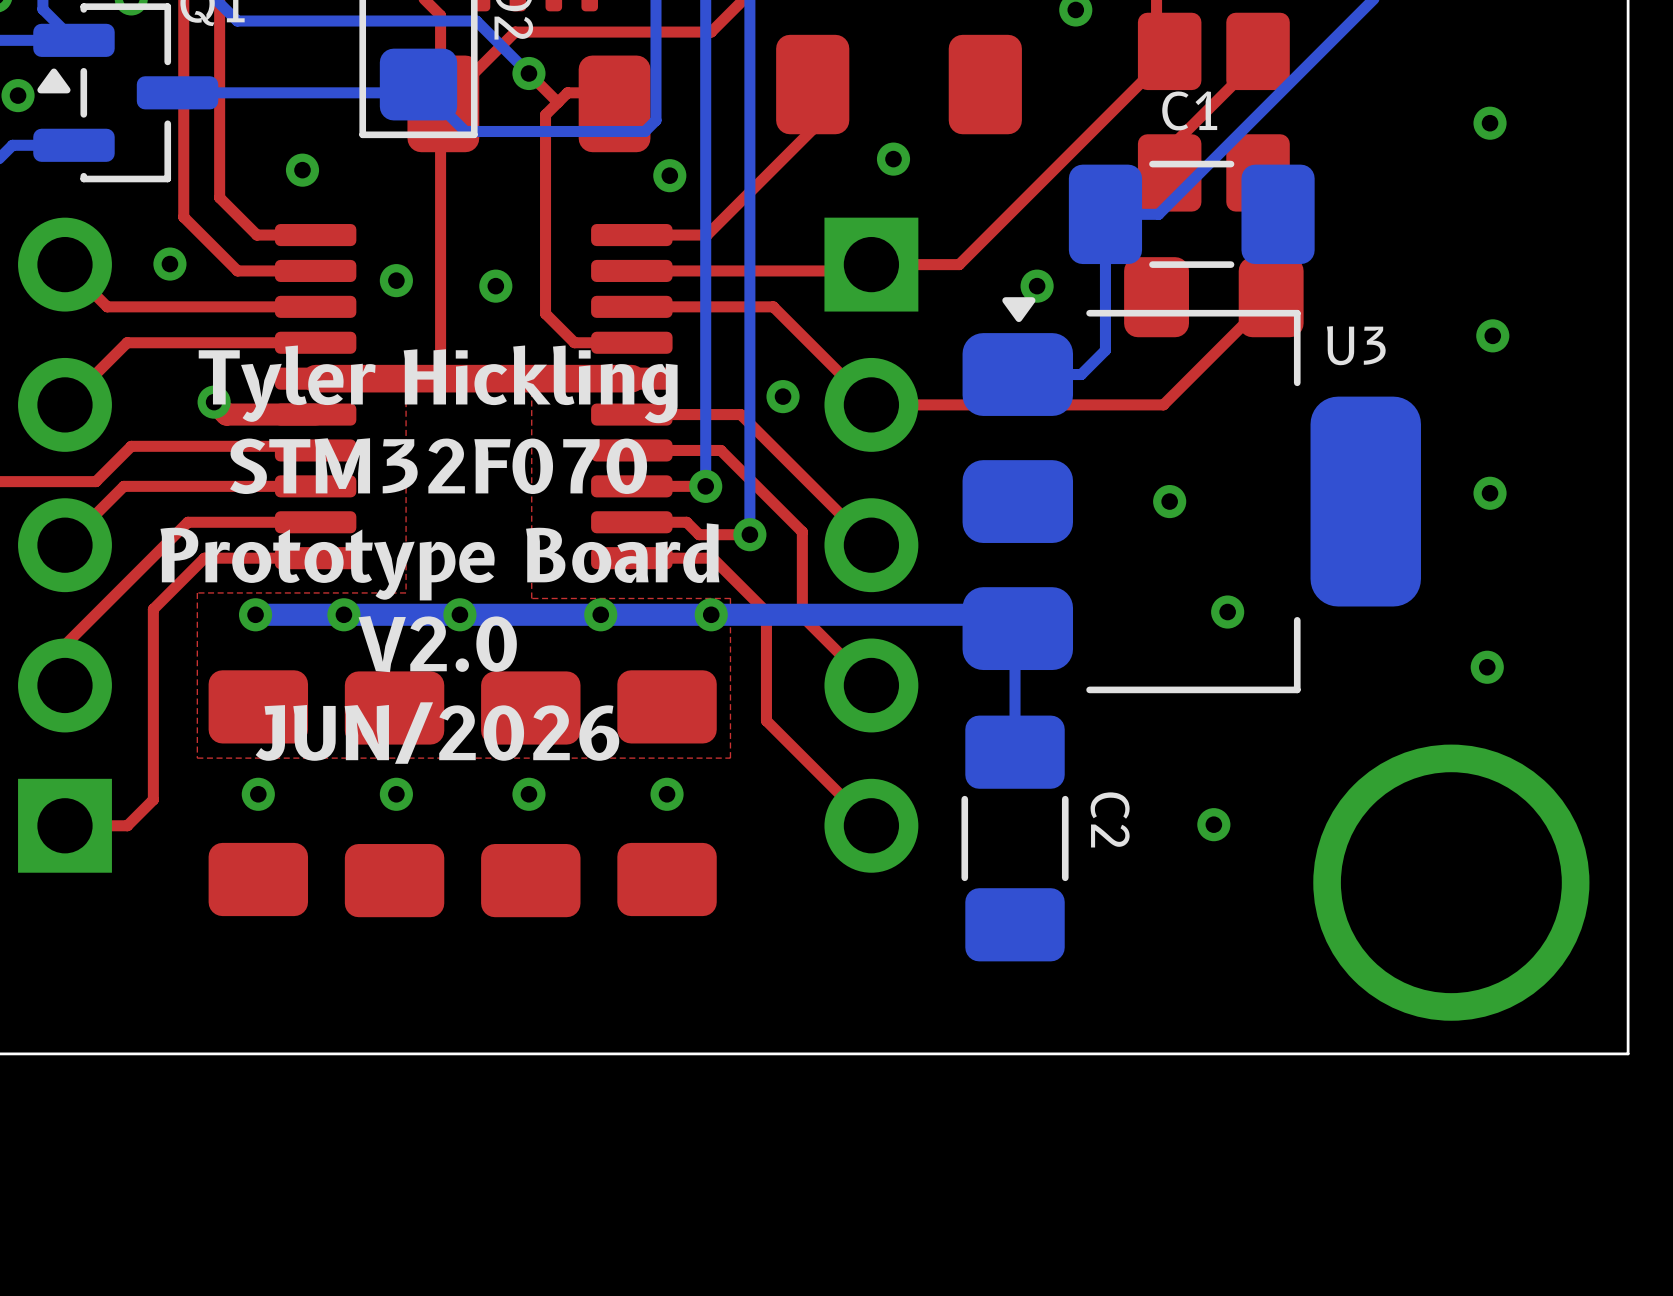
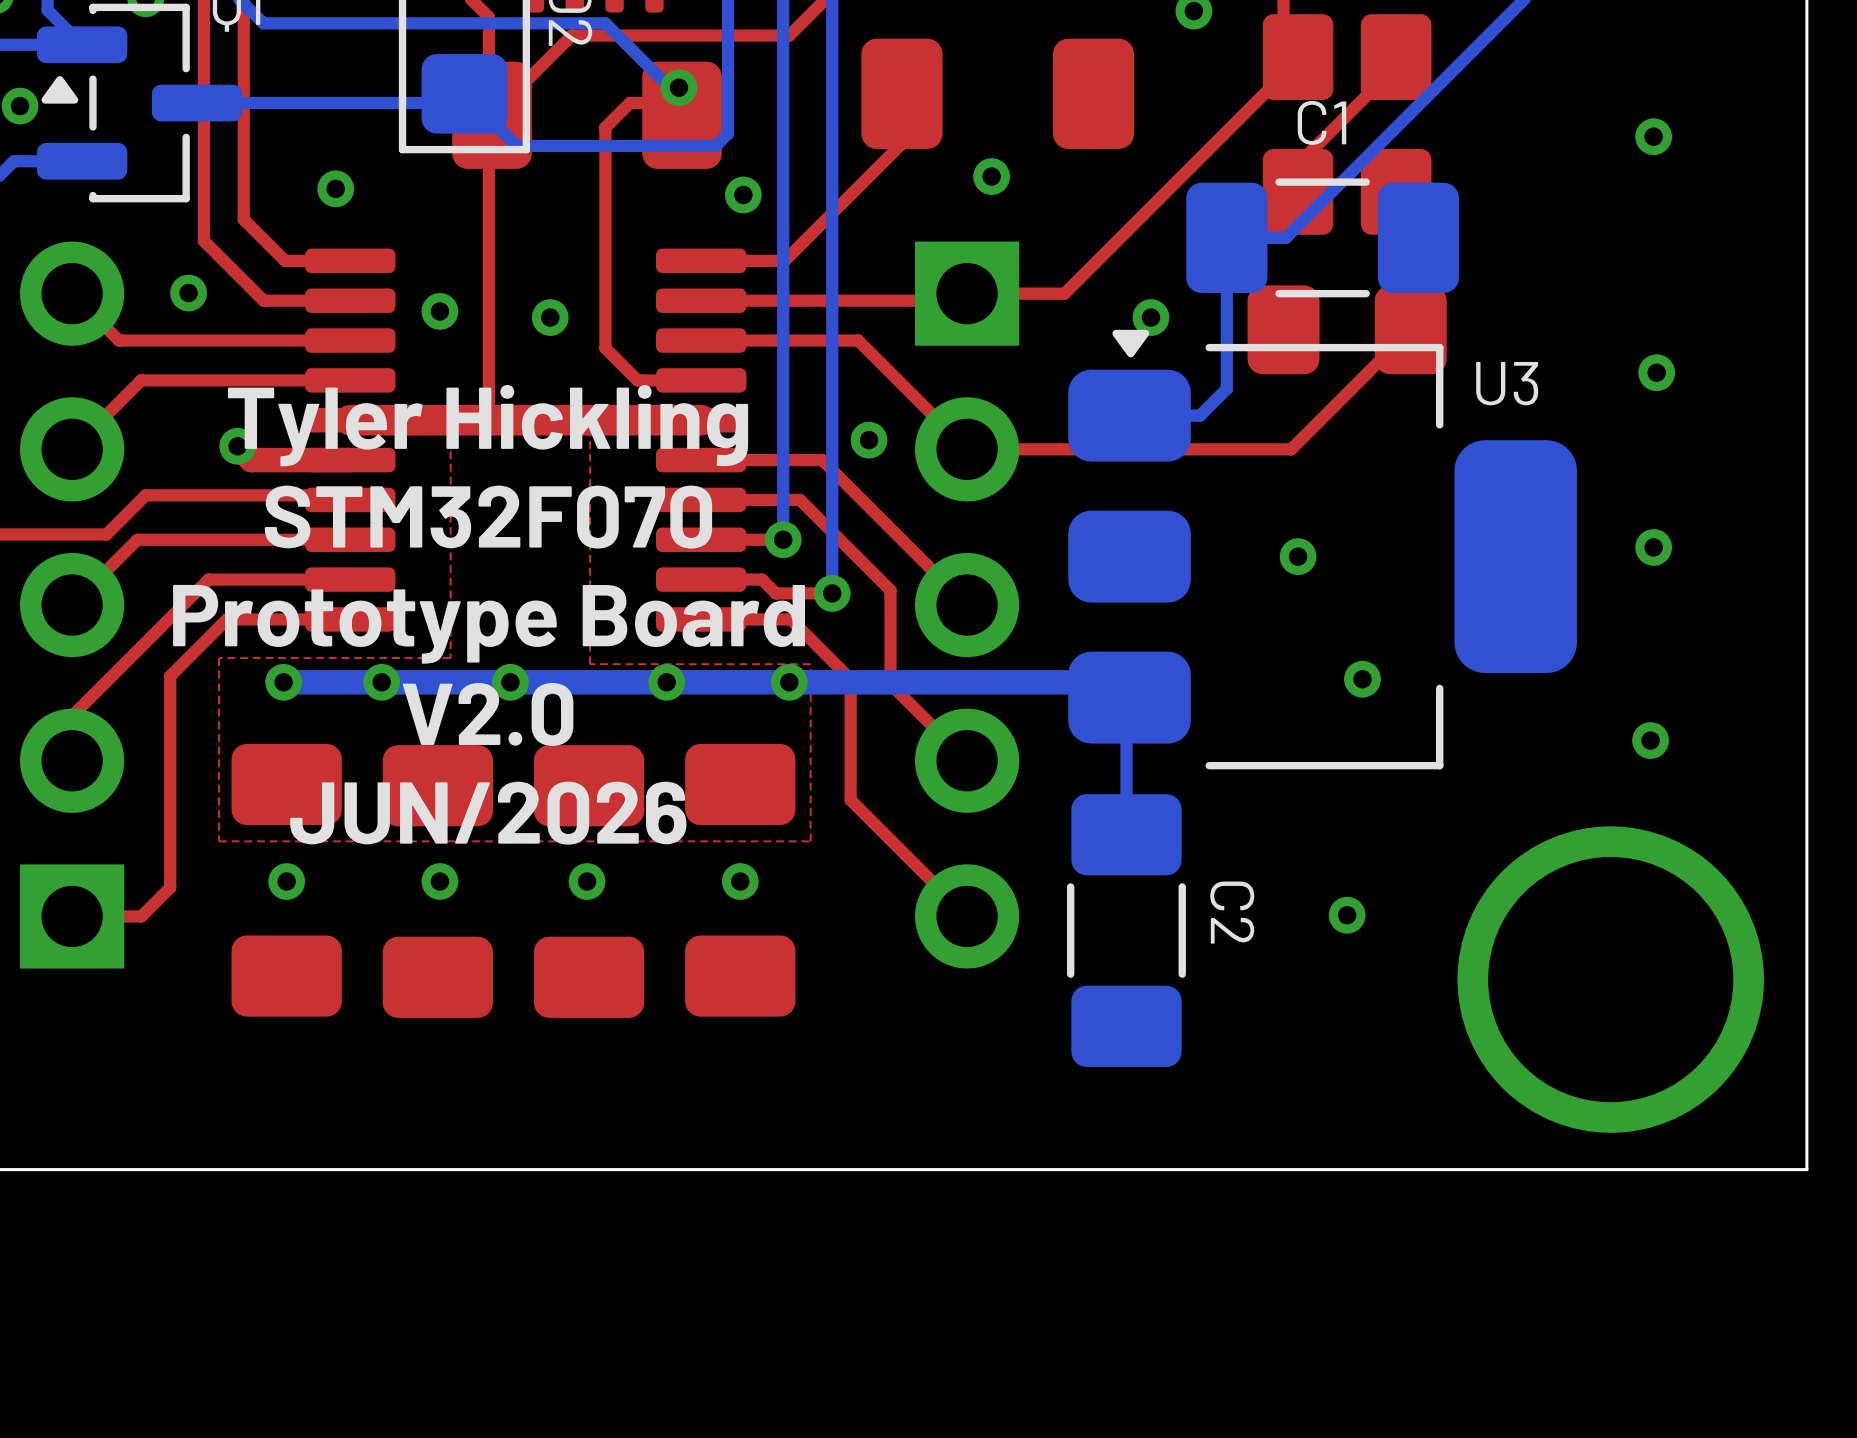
bottom track: (476, 21) (528, 73) -> (528, 23) (605, 23) (669, 87) (678, 87)
top track: (528, 73) (557, 102) -> none
via position: (528, 73) -> (678, 87)

